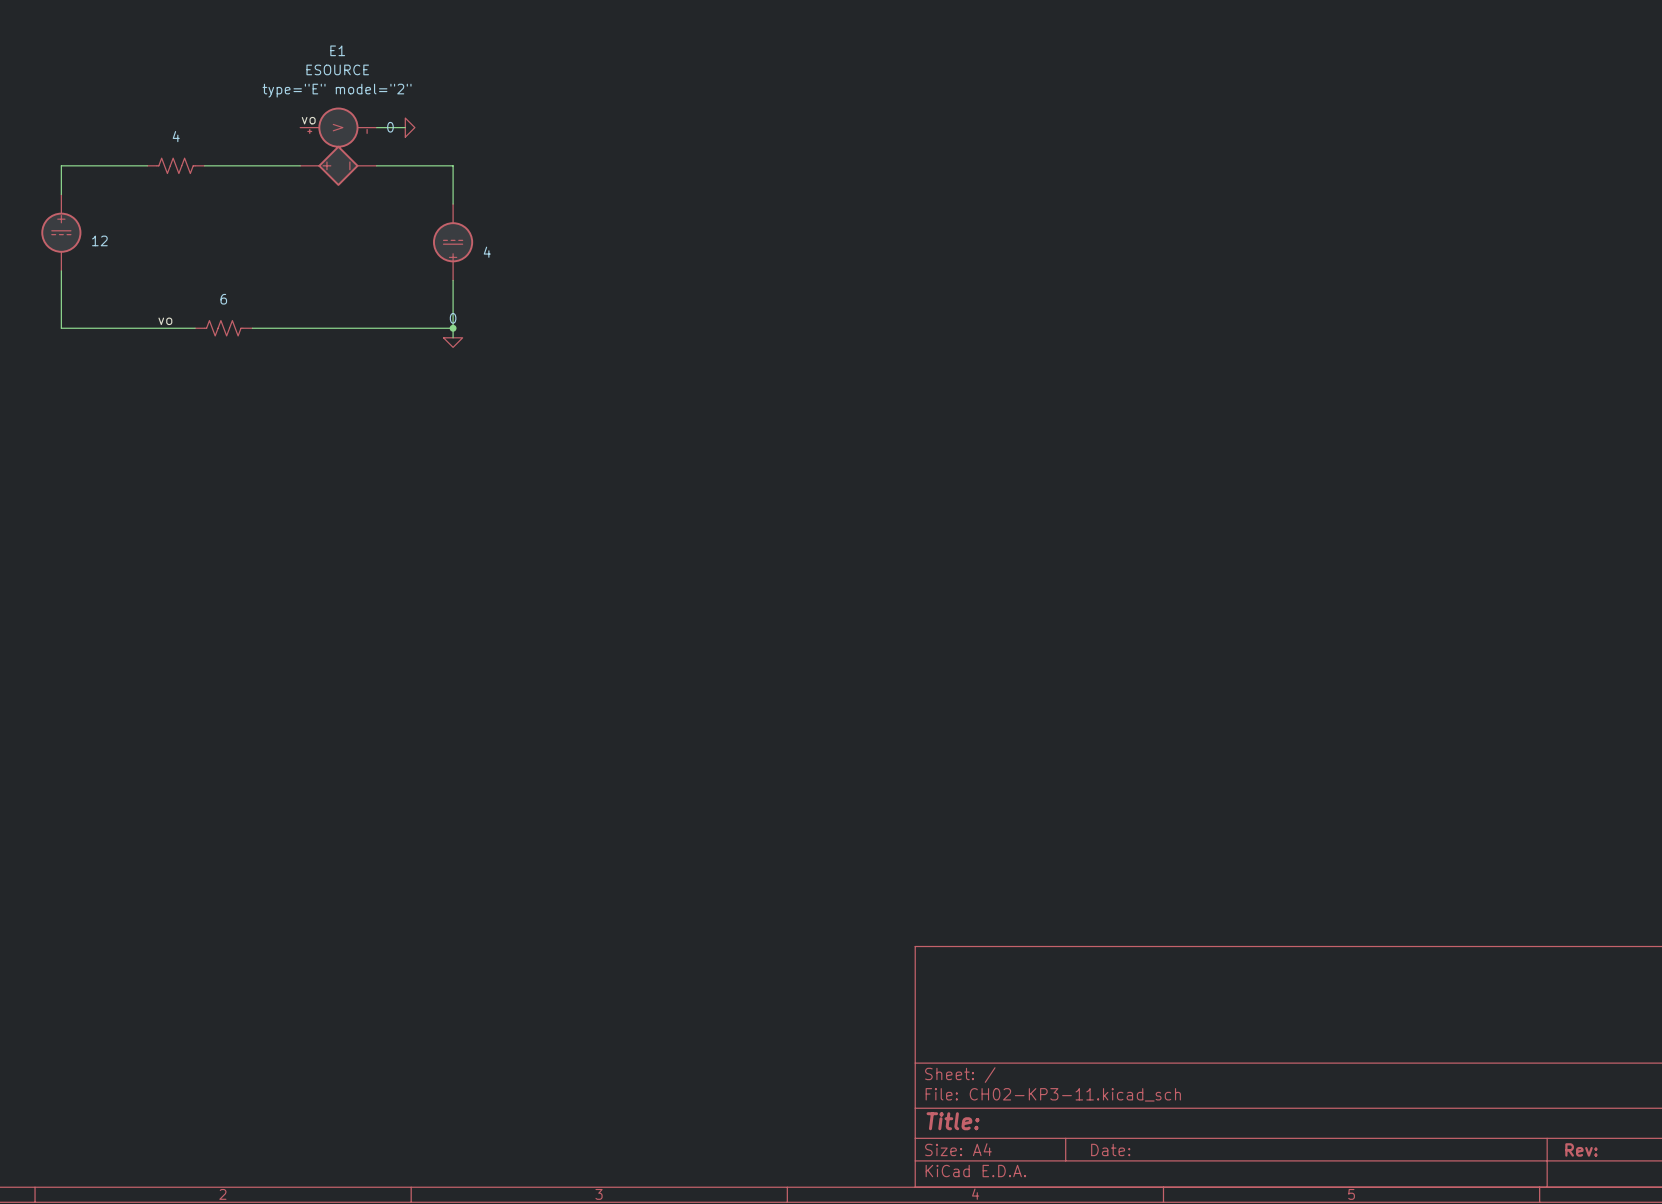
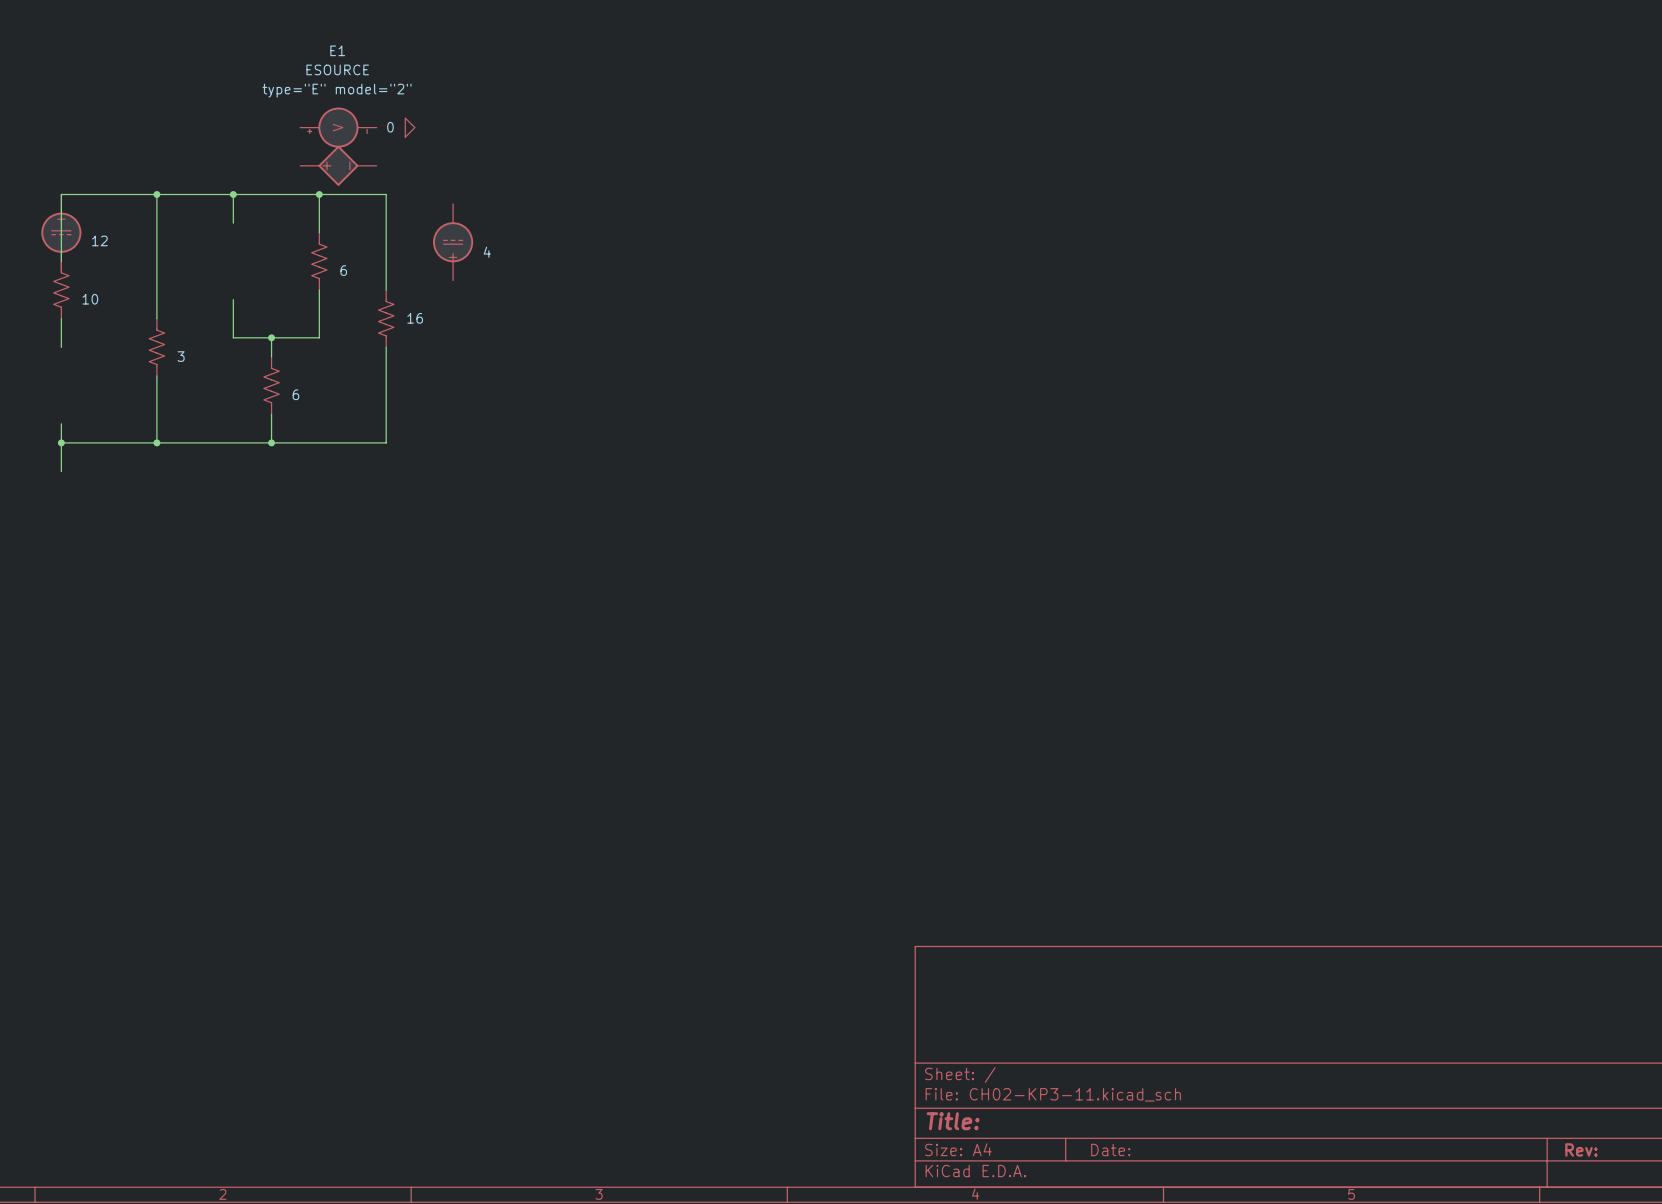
label: vo (308, 120) -> none
wire: (376, 127) (405, 127) -> none
wire: (147, 165) (61, 165) (61, 194) -> none
part: 4 (176, 165) -> none
wire: (204, 165) (300, 165) -> none
wire: (376, 165) (453, 165) (453, 204) -> none
wire: none -> (156, 194) (156, 318)
junction: none -> (156, 194)
wire: none -> (233, 194) (233, 223)
junction: none -> (233, 194)
wire: none -> (319, 194) (319, 232)
junction: none -> (319, 194)
wire: none -> (61, 261) (61, 194) (386, 194) (386, 290)
part: none -> 6 (319, 261)
wire: (61, 270) (61, 318) -> (61, 423) (61, 471)
wire: (453, 280) (453, 337) -> none
part: none -> 10 (61, 290)
wire: none -> (319, 290) (319, 337) (233, 337) (233, 299)
part: none -> 16 (386, 318)
label: vo (165, 321) -> none
wire: (61, 328) (195, 328) -> (61, 328) (61, 347)
part: 6 (223, 328) -> none
wire: (252, 328) (453, 328) -> none
junction: (453, 328) -> none
wire: none -> (271, 337) (271, 356)
junction: none -> (271, 337)
power symbol: 0 (453, 342) -> none
part: none -> 3 (156, 347)
wire: none -> (386, 347) (386, 442) (61, 442)
wire: none -> (156, 376) (156, 442)
part: none -> 6 (271, 385)
wire: none -> (271, 414) (271, 442)
junction: none -> (61, 442)
junction: none -> (156, 442)
junction: none -> (271, 442)

